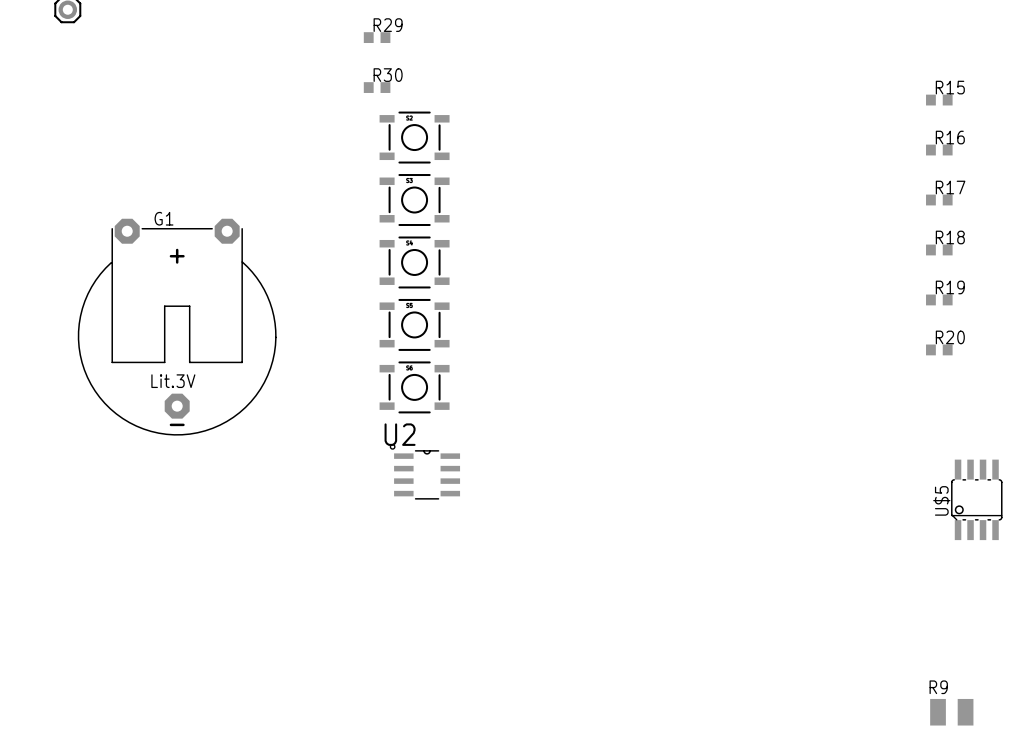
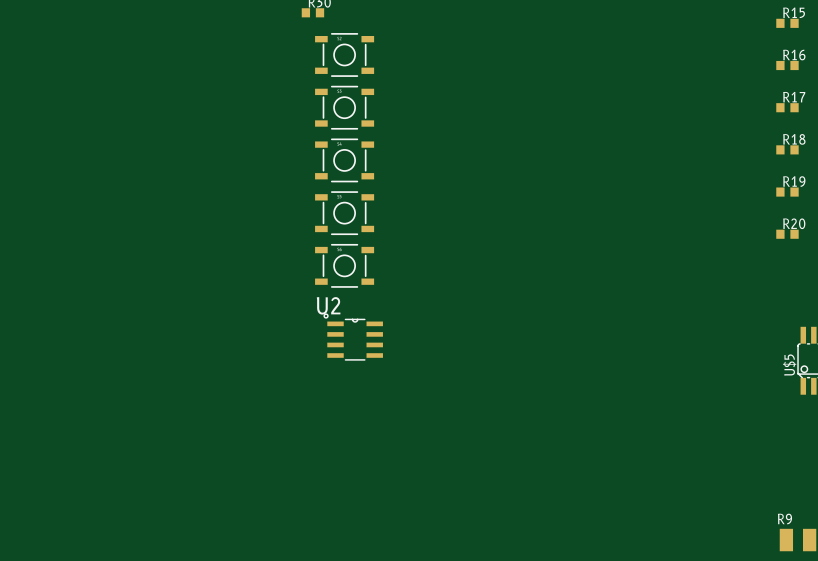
G1: (177, 327) -> none

